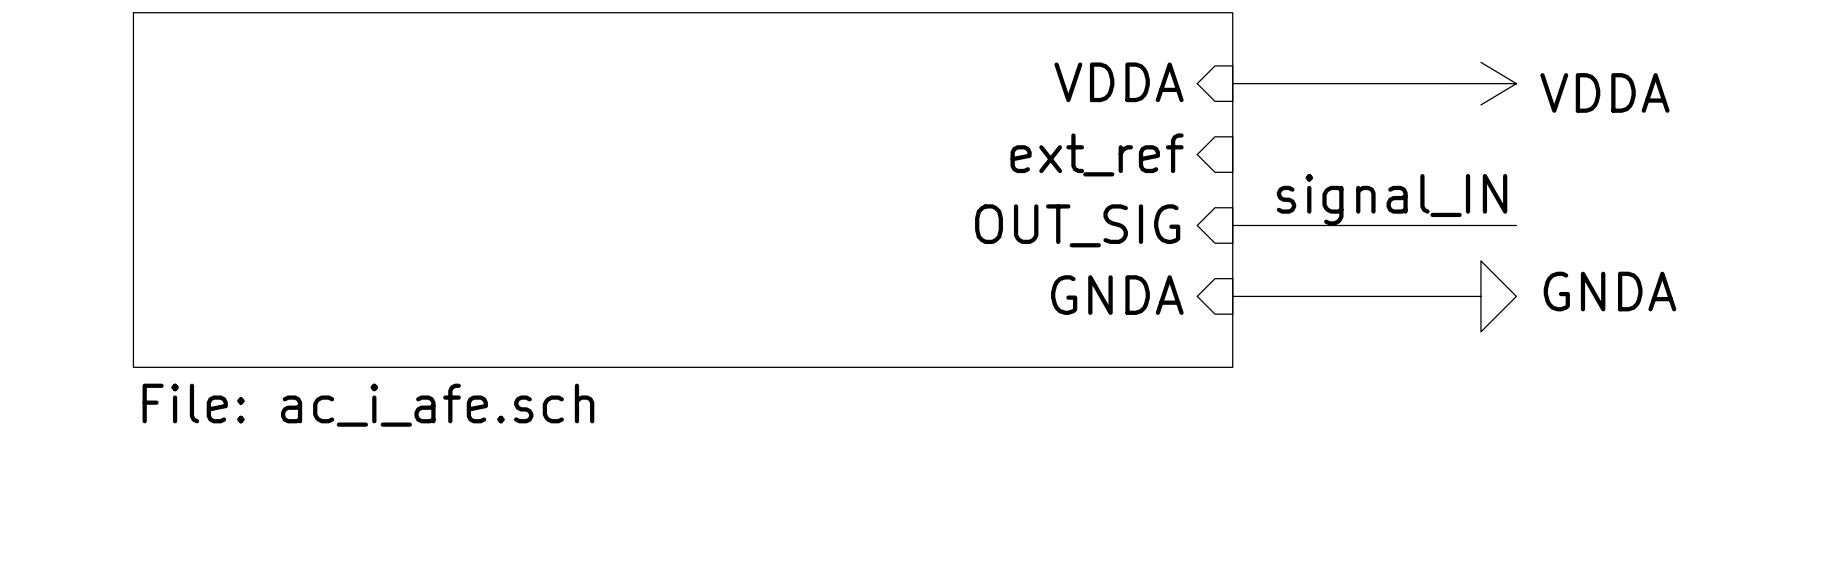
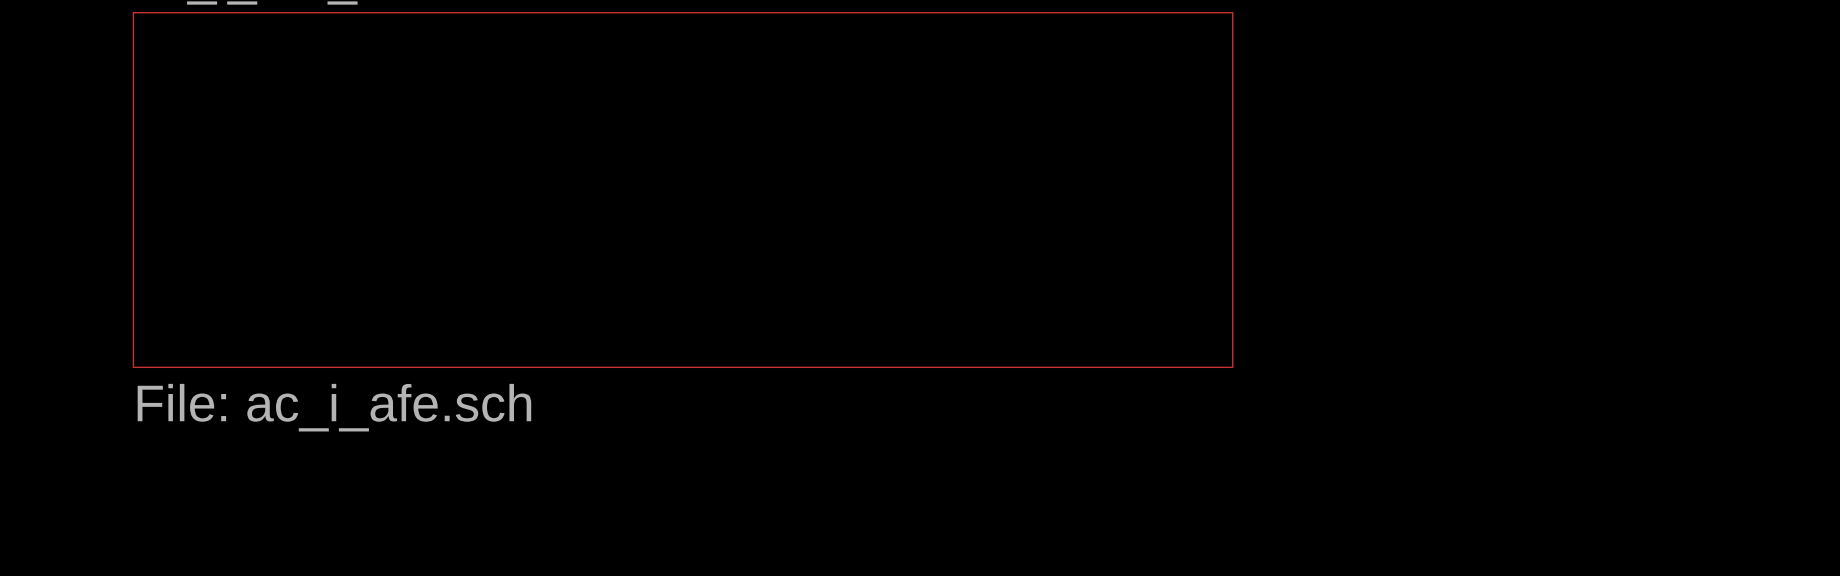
sheet pin: VDDA (1119, 82) -> none
wire: (1232, 83) (1445, 83) -> none
power symbol: VDDA (1480, 83) -> none
sheet pin: ext_ref (1097, 154) -> none
label: signal_IN (1392, 199) -> none
sheet pin: OUT_SIG (1077, 225) -> none
wire: (1232, 225) (1516, 225) -> none
sheet pin: GNDA (1117, 295) -> none
wire: (1232, 296) (1445, 296) -> none
power symbol: GNDA (1480, 296) -> none

